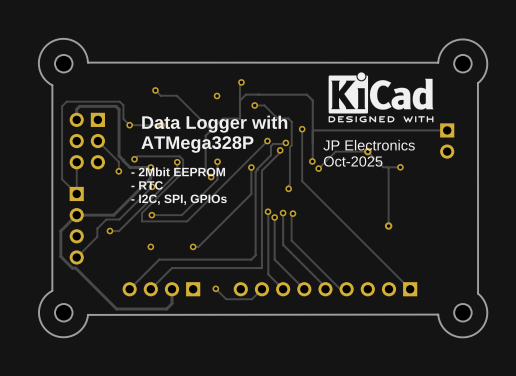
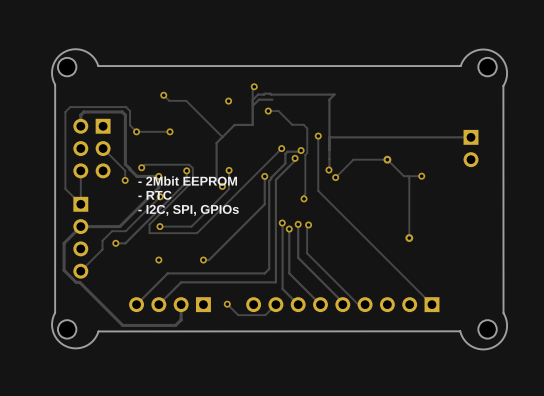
drawing: [328, 72, 434, 123] -> none
board edge: (477, 83) (485, 73) (486, 58) (479, 45) (465, 39) (456, 40) (445, 46) (440, 53) (438, 62) (87, 62) (84, 51) (76, 42) (64, 38) (52, 41) (43, 48) (38, 63) (41, 74) (52, 85) (52, 290) -> (503, 87) (507, 74) (504, 62) (496, 53) (484, 49) (469, 53) (460, 66) (98, 66) (94, 57) (84, 50) (72, 49) (63, 52) (55, 61) (51, 73) (55, 84) (55, 312) (52, 324) (53, 333) (58, 341) (66, 346) (75, 348) (89, 343) (98, 331) (460, 331) (467, 343) (475, 348) (483, 349) (495, 346) (504, 335) (507, 324) (503, 309)
track: (258, 94) (306, 94) (312, 100) -> (252, 105) (252, 99) (258, 94) (334, 94) (329, 99) (329, 105)
text: Data Logger with (214, 124) -> none
text: ATMega328P (197, 144) -> none
text: JP Electronics (369, 145) -> none
text: Oct-2025 (353, 161) -> none
board edge: (52, 290) (41, 302) (39, 317) (47, 331) (55, 335) (64, 337) (79, 331) (85, 324) (88, 314) (438, 314) (440, 323) (445, 330) (453, 335) (465, 337) (479, 331) (486, 318) (485, 303) (478, 293) -> none

